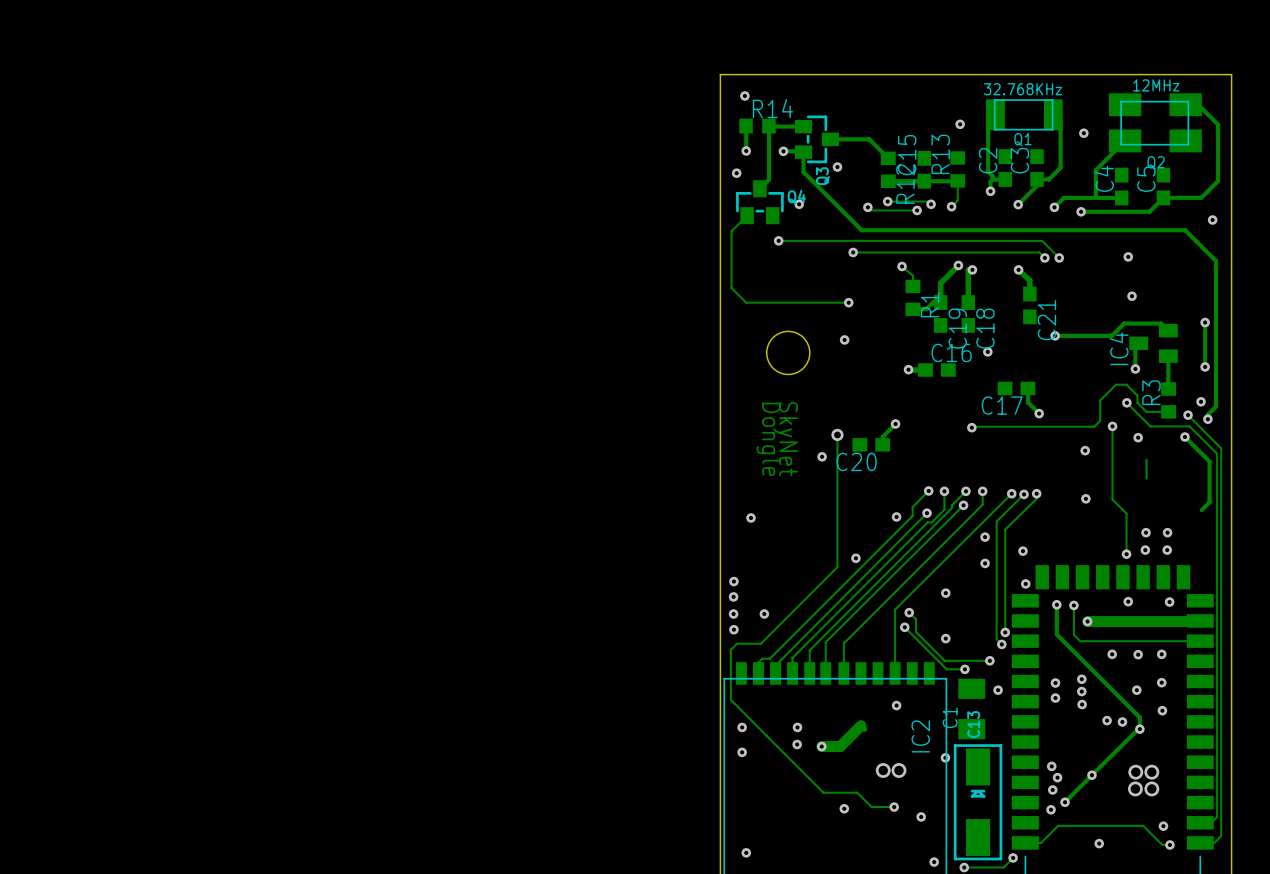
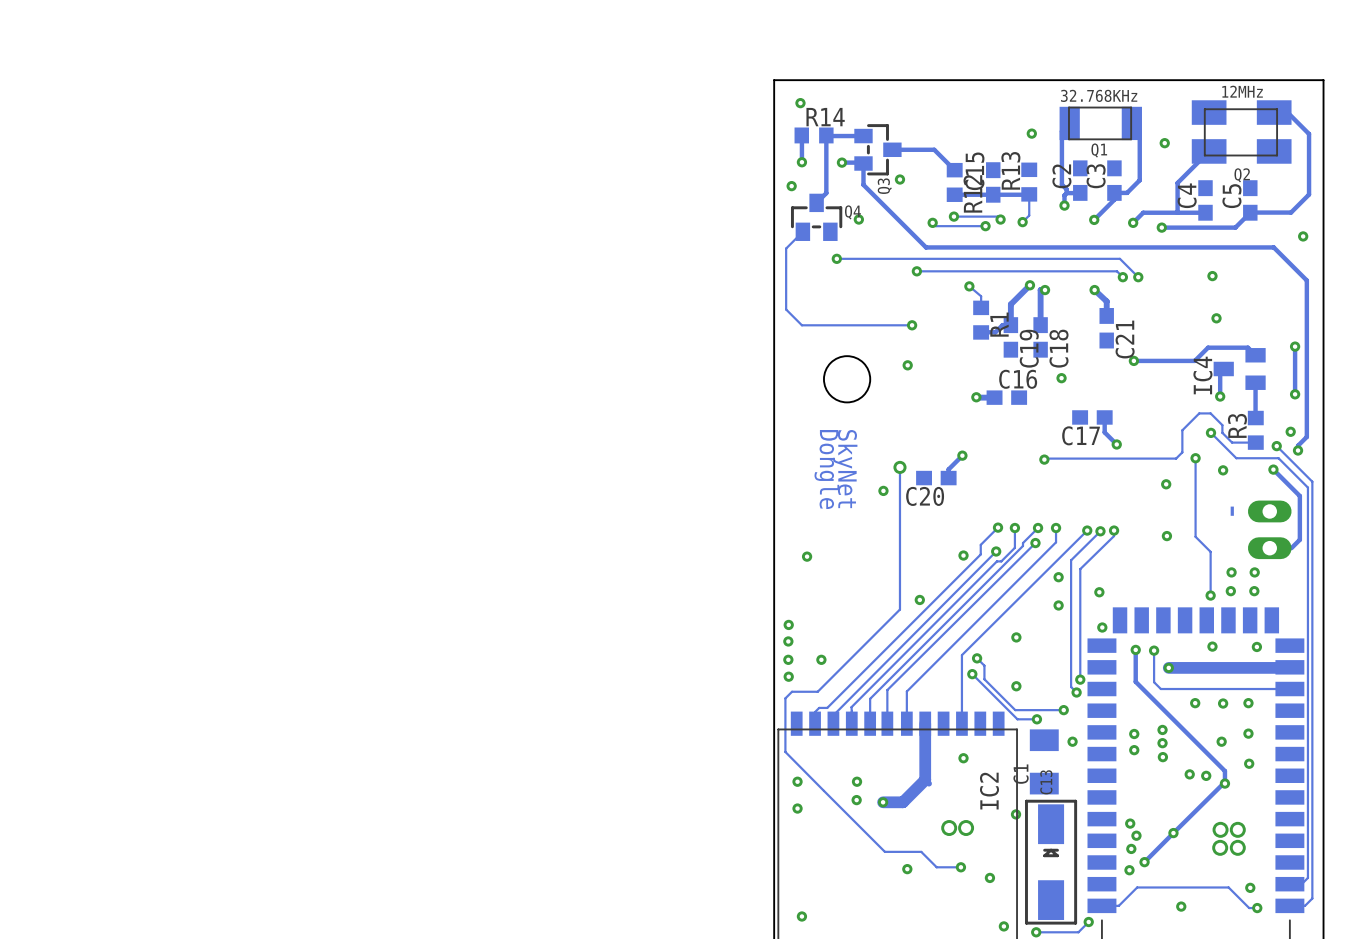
part: none -> (1269, 529)
track: none -> (925, 723) (925, 779)

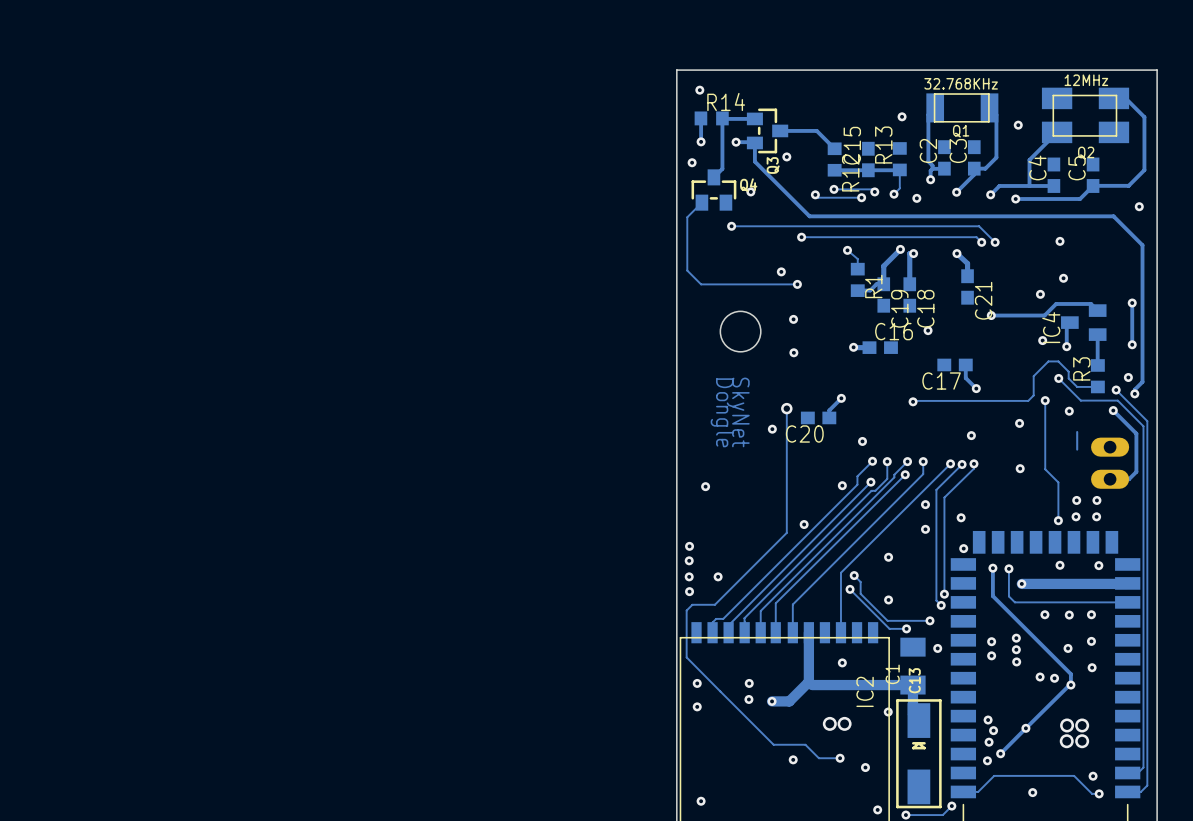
via: none -> (916, 198)
via: none -> (781, 271)
via: none -> (1040, 294)
via: none -> (1042, 340)
via: none -> (793, 352)
via: none -> (971, 435)
via: none -> (862, 441)
track: none -> (812, 685) (912, 685) (912, 714)

